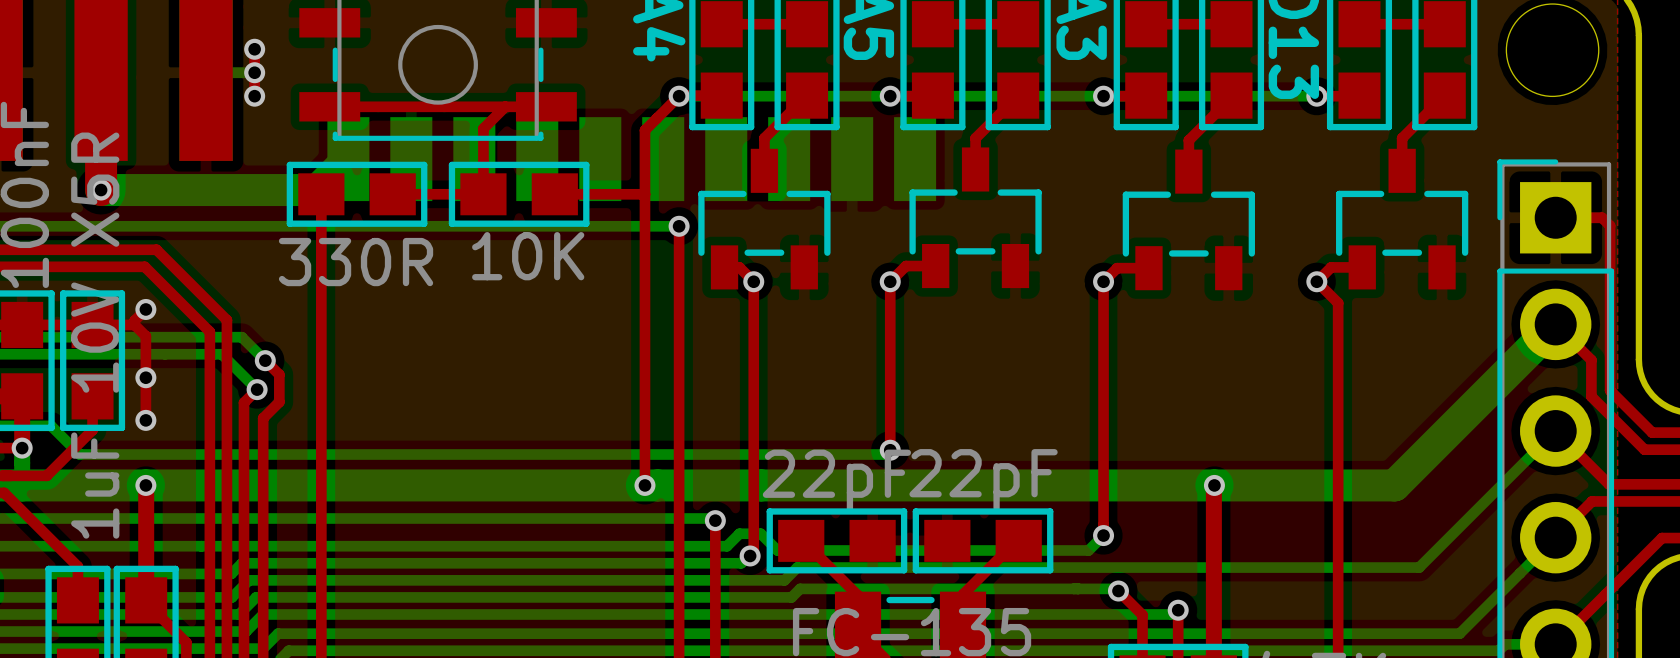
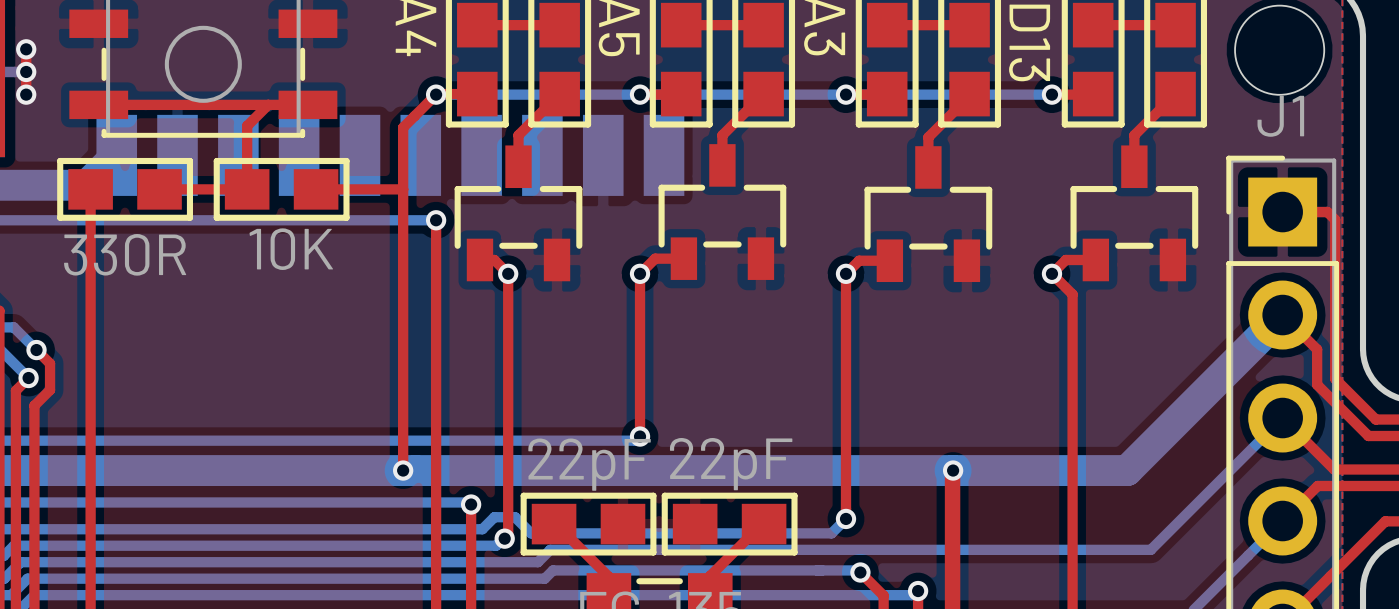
J1 name: none -> J1 (1280, 116)

